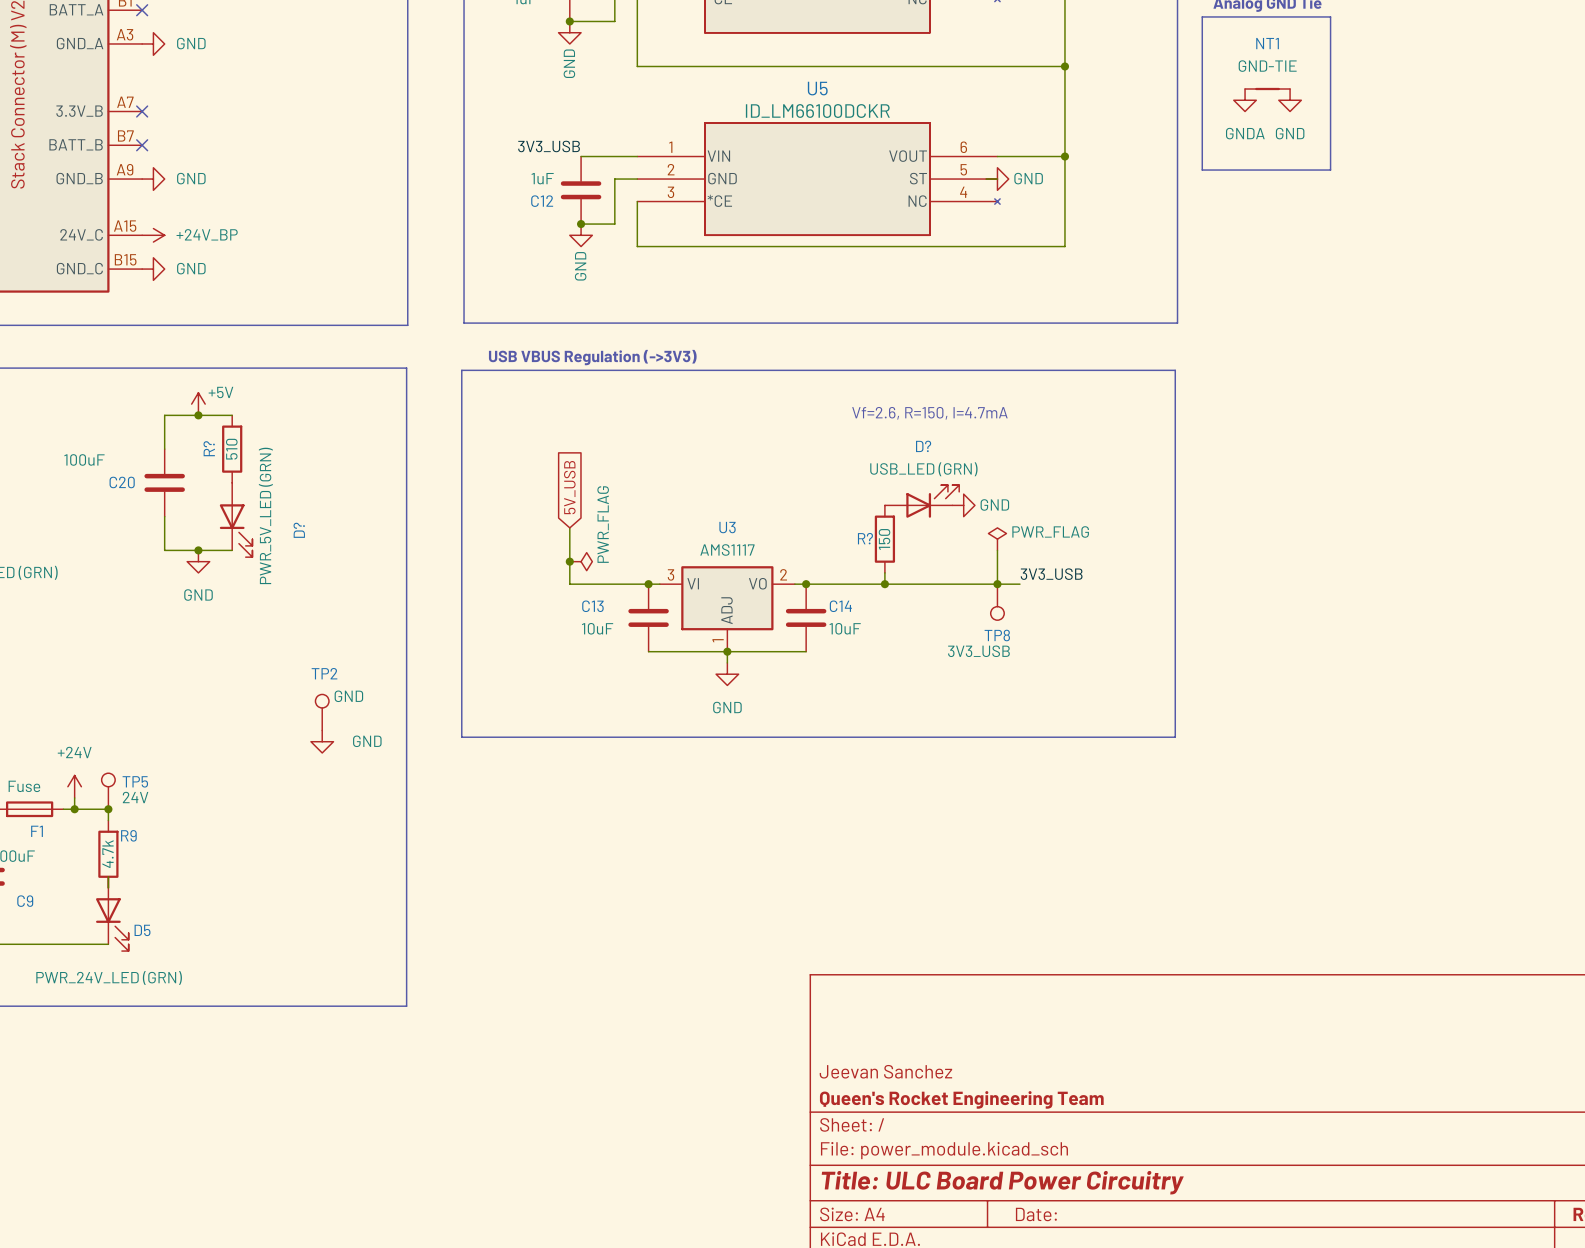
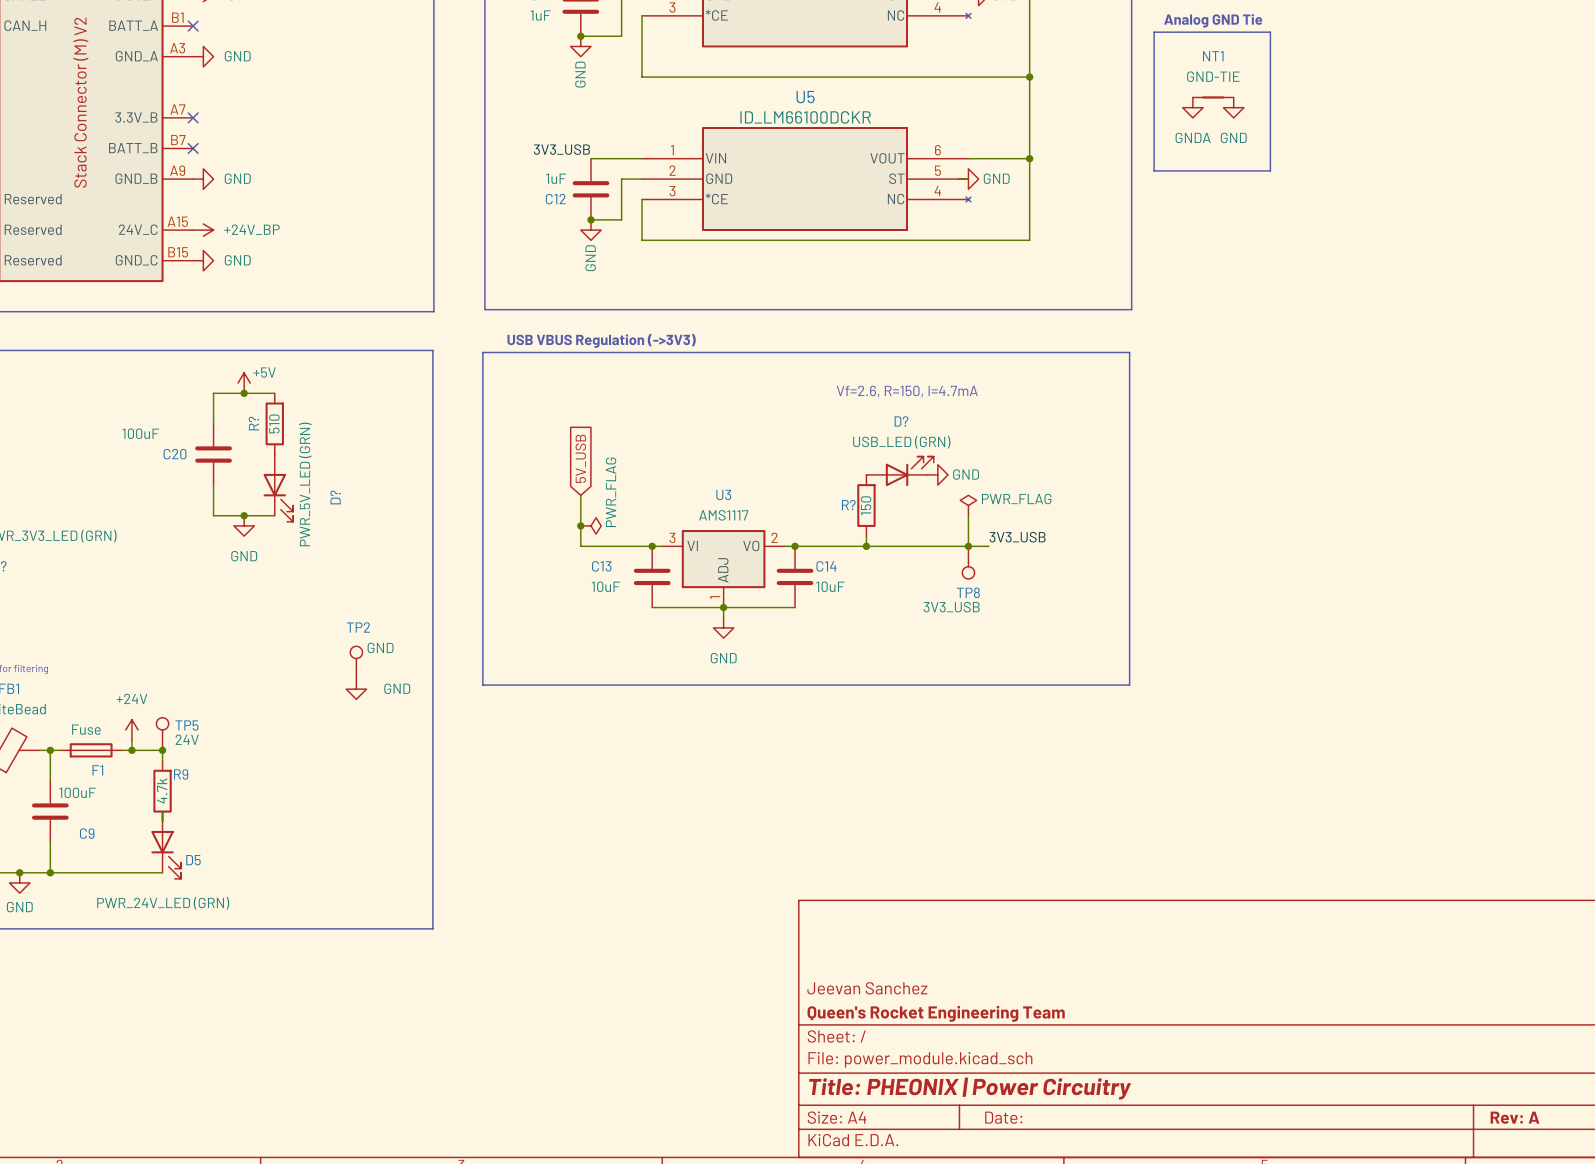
title block: Title: ULC Board Power Circuitry (1002, 1182) -> Title: PHEONIX | Power Circuitry (970, 1088)

